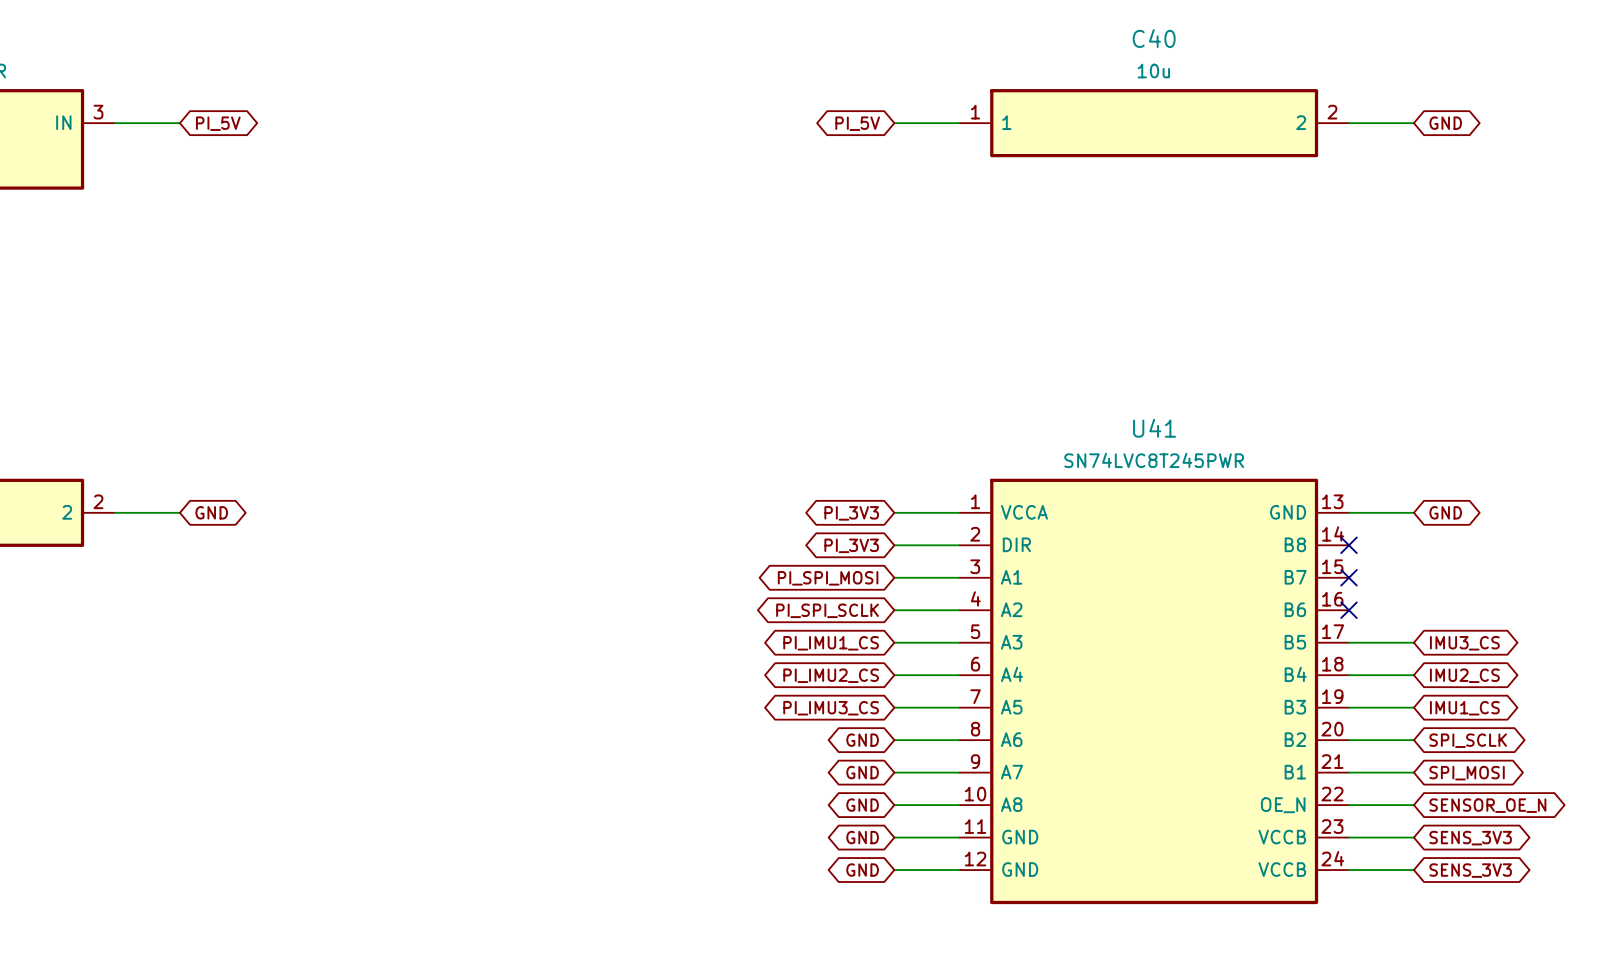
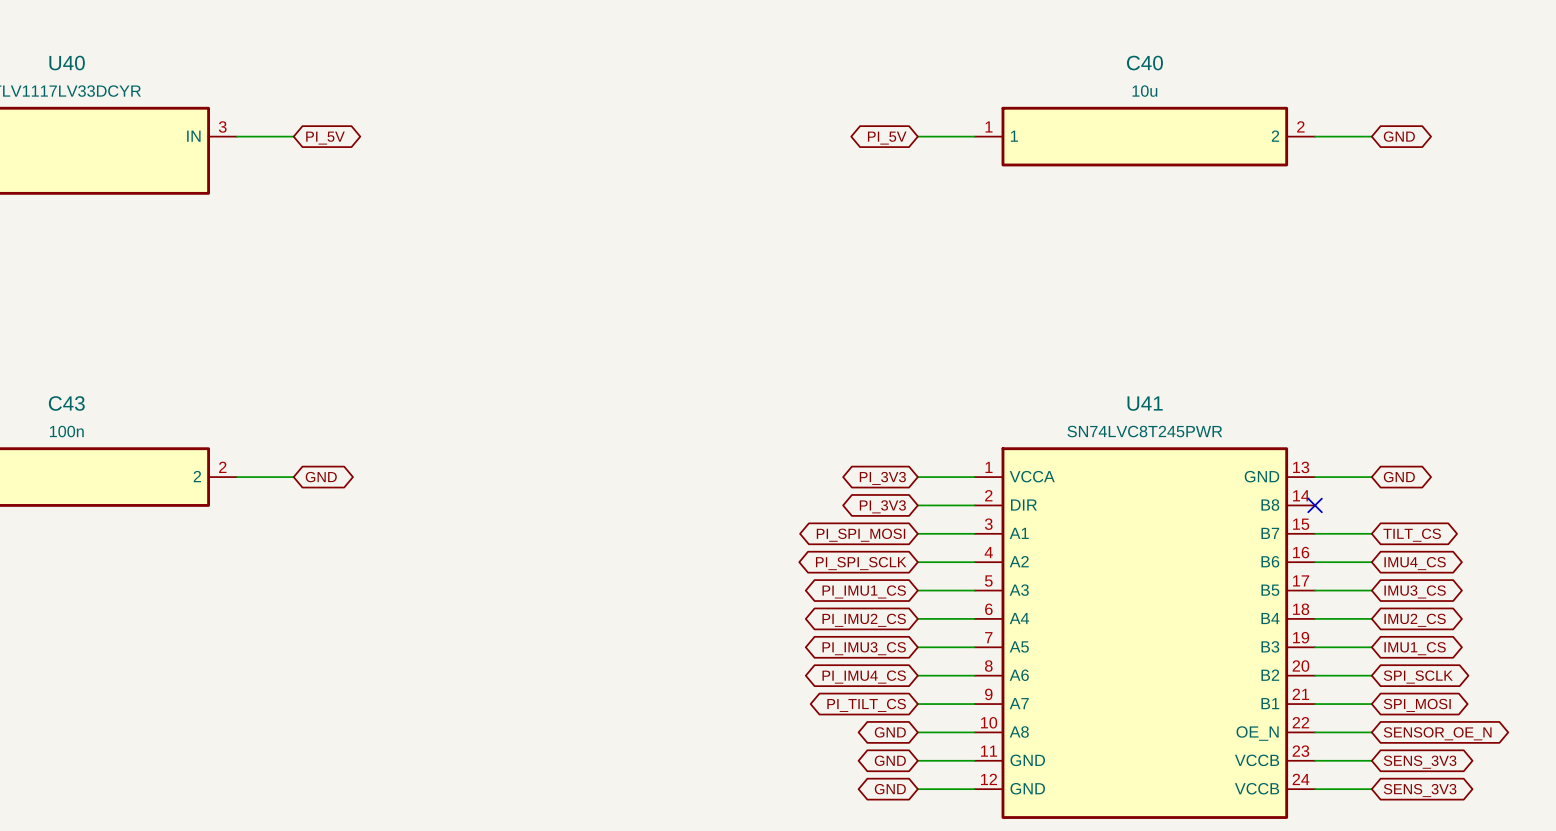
wire: none -> (1315, 533) (1371, 533)
no-connect mark: (1348, 577) -> none
global label: none -> TILT_CS (1412, 535)
wire: none -> (1315, 562) (1371, 562)
no-connect mark: (1348, 610) -> none
global label: none -> IMU4_CS (1415, 563)
global label: GND (862, 740) -> PI_IMU4_CS (864, 677)
global label: GND (862, 772) -> PI_TILT_CS (866, 705)

